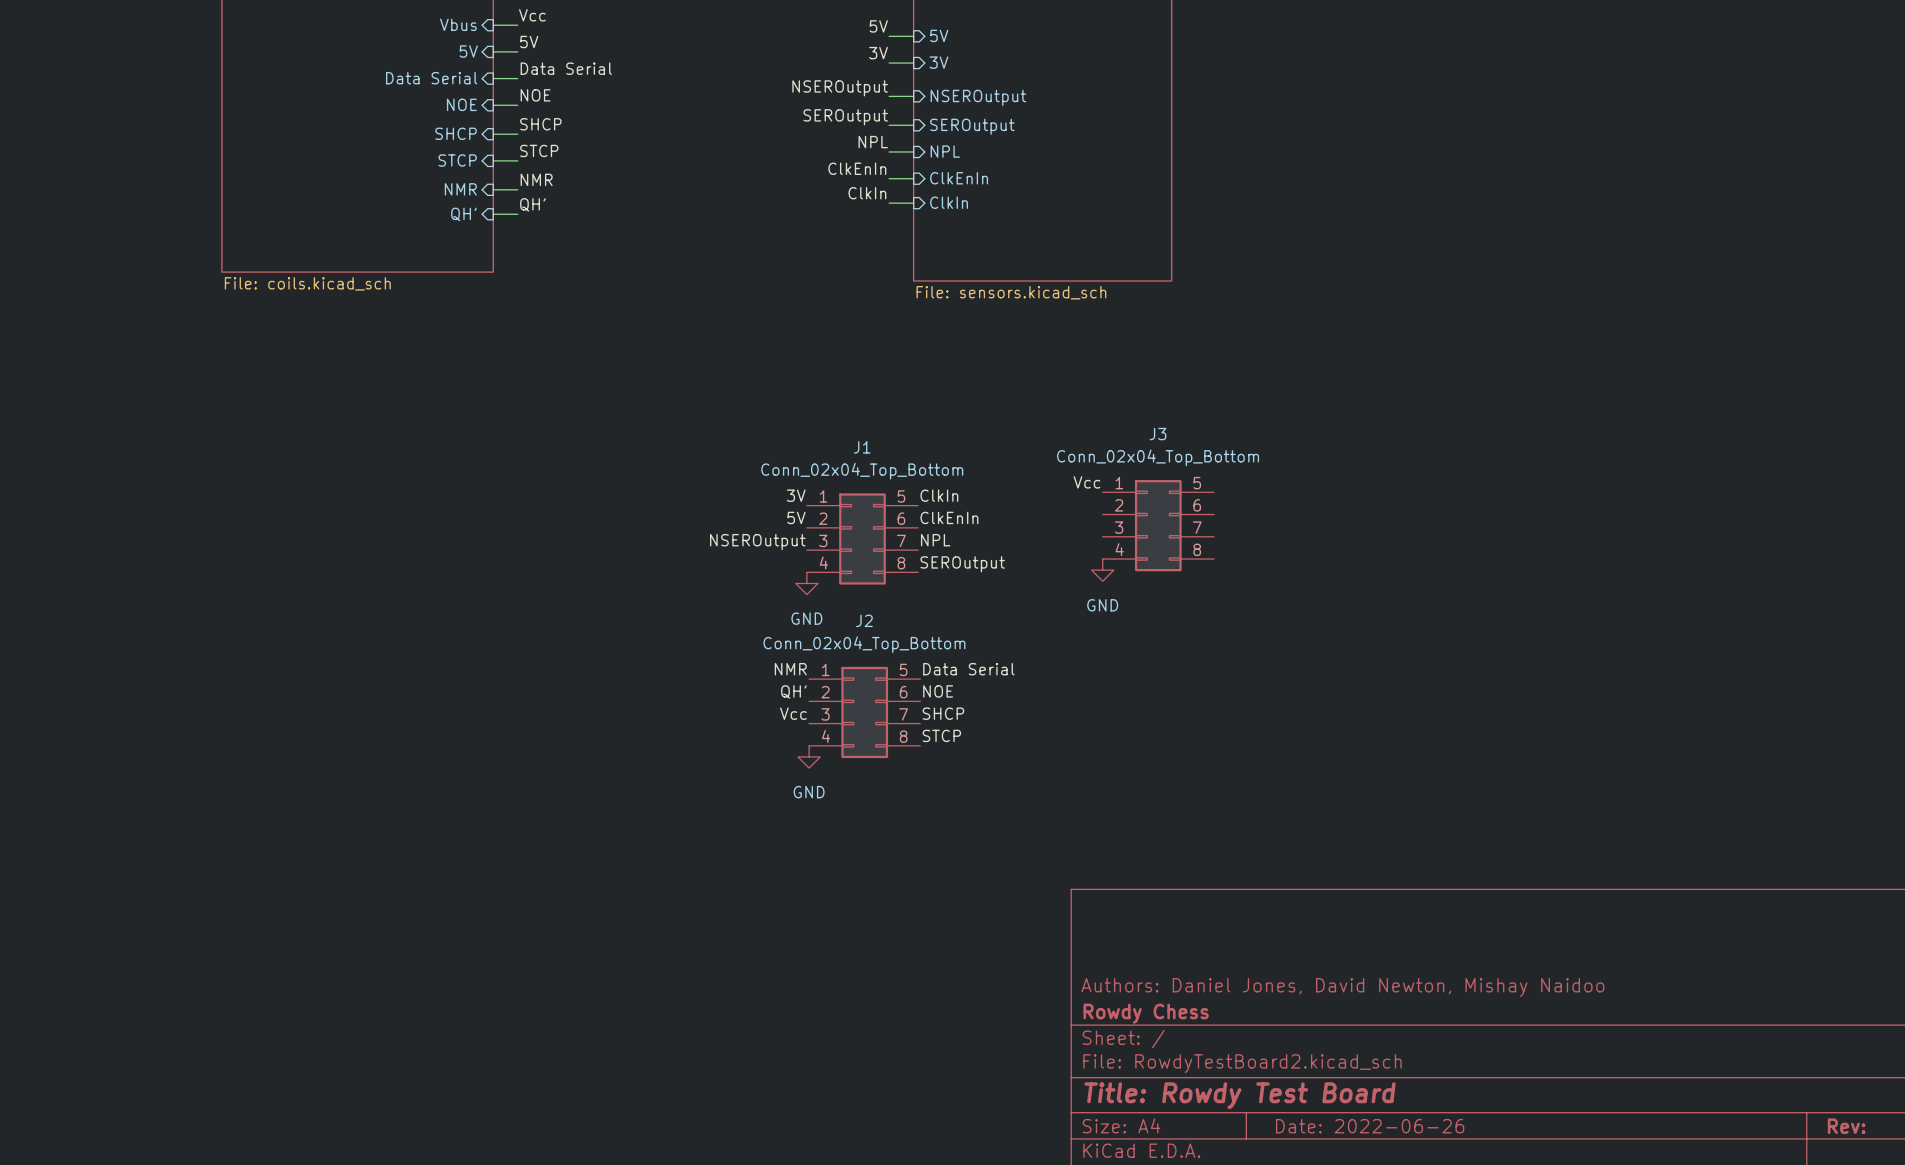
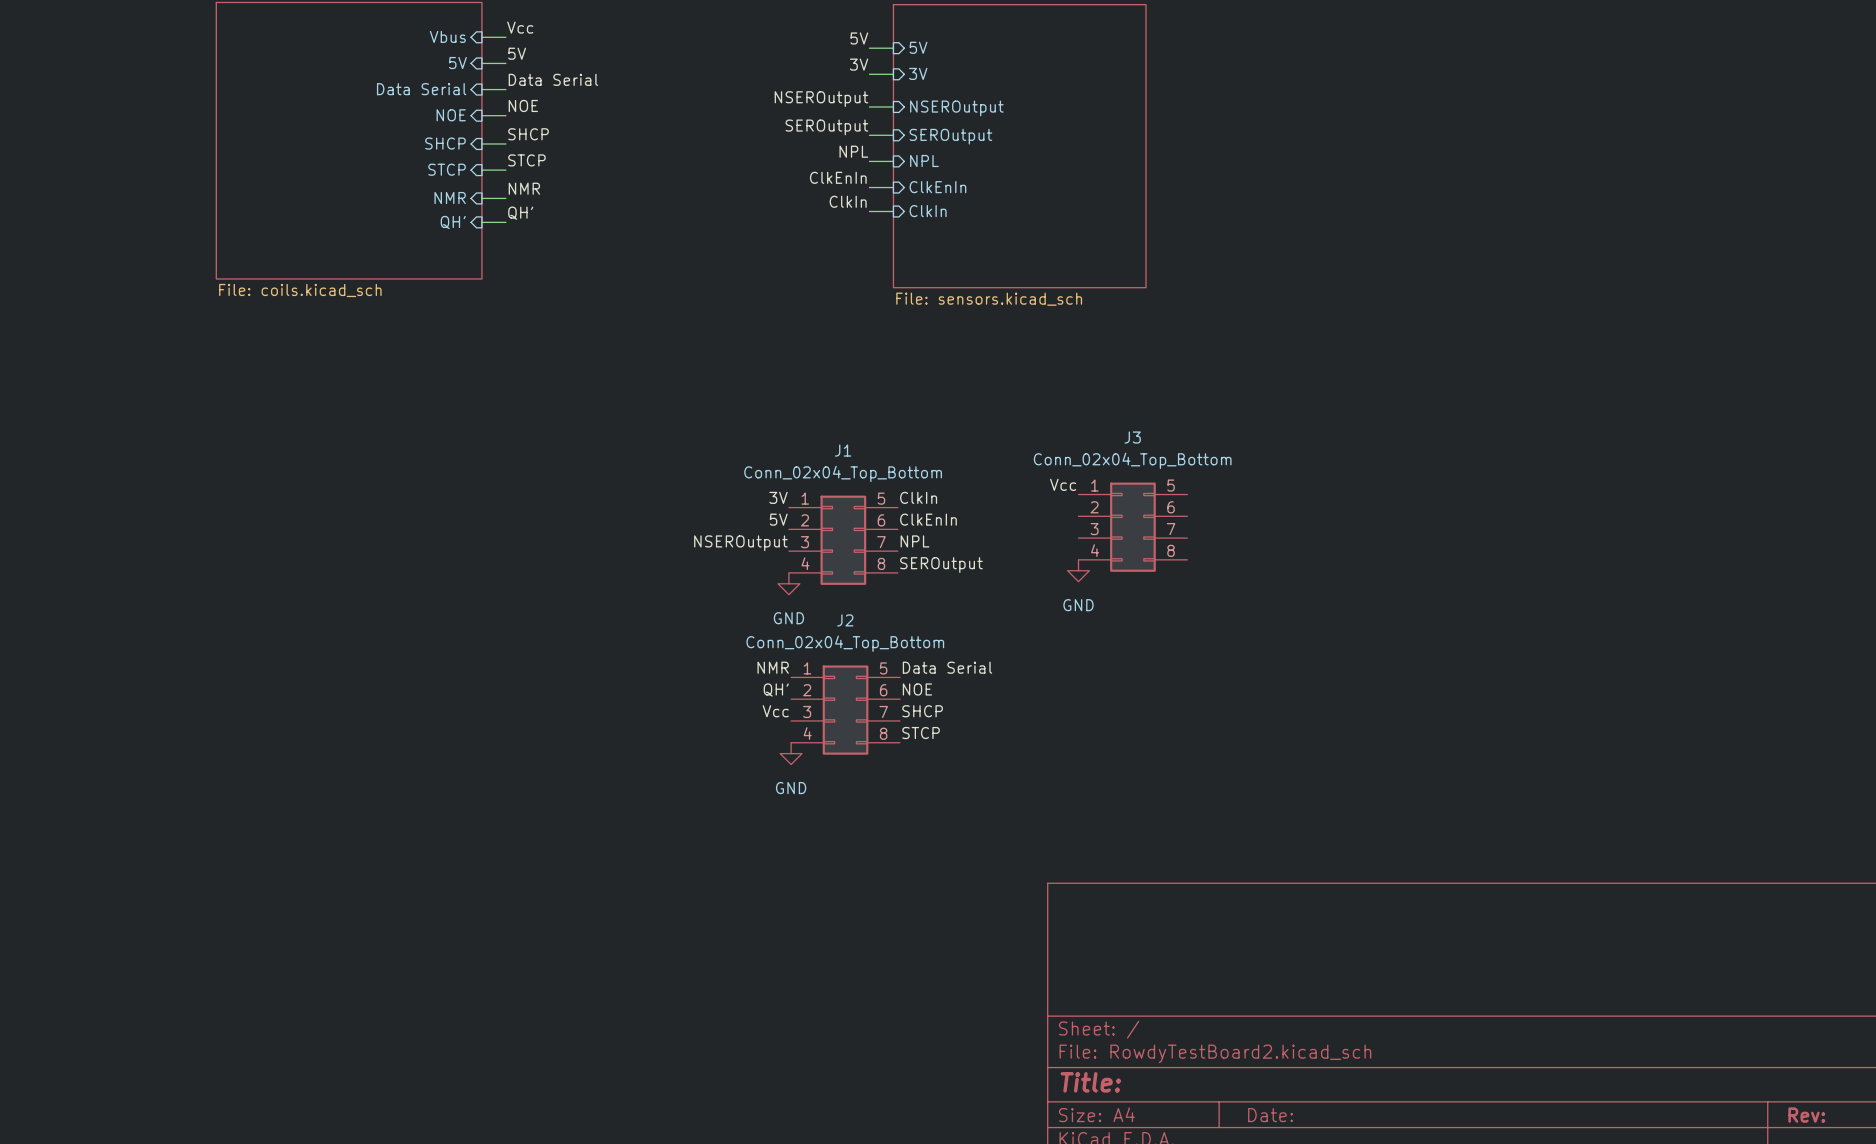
title block: Authors: Daniel Jones, David Newton, Mishay Naidoo (1342, 987) -> none
title block: Rowdy Chess (1146, 1013) -> none
title block: Title: Rowdy Test Board (1240, 1095) -> Title: (1090, 1082)
title block: Date: 2022-06-26 (1370, 1126) -> Date: (1270, 1115)

